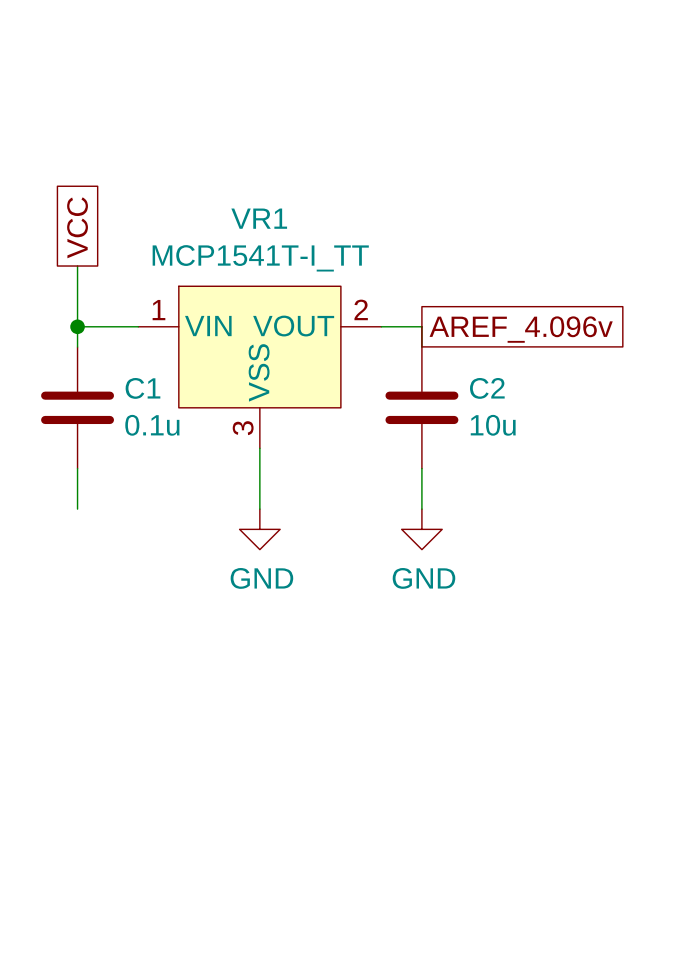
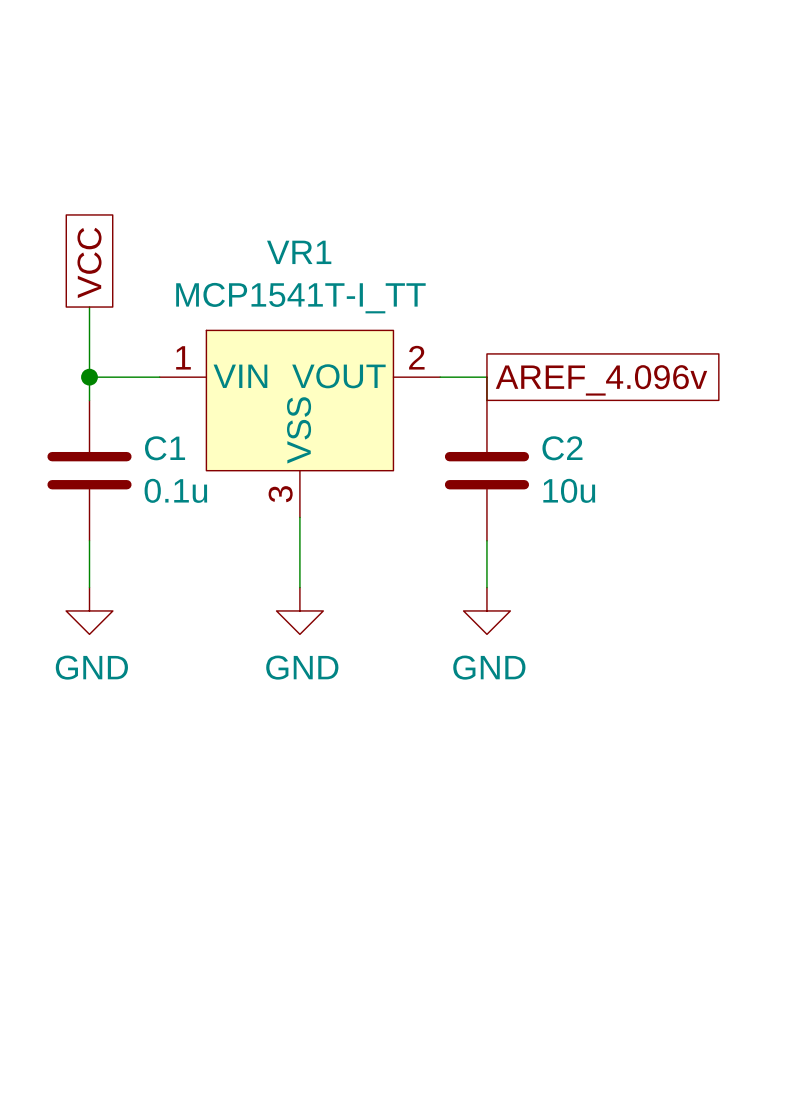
power symbol: none -> GND (89, 610)

